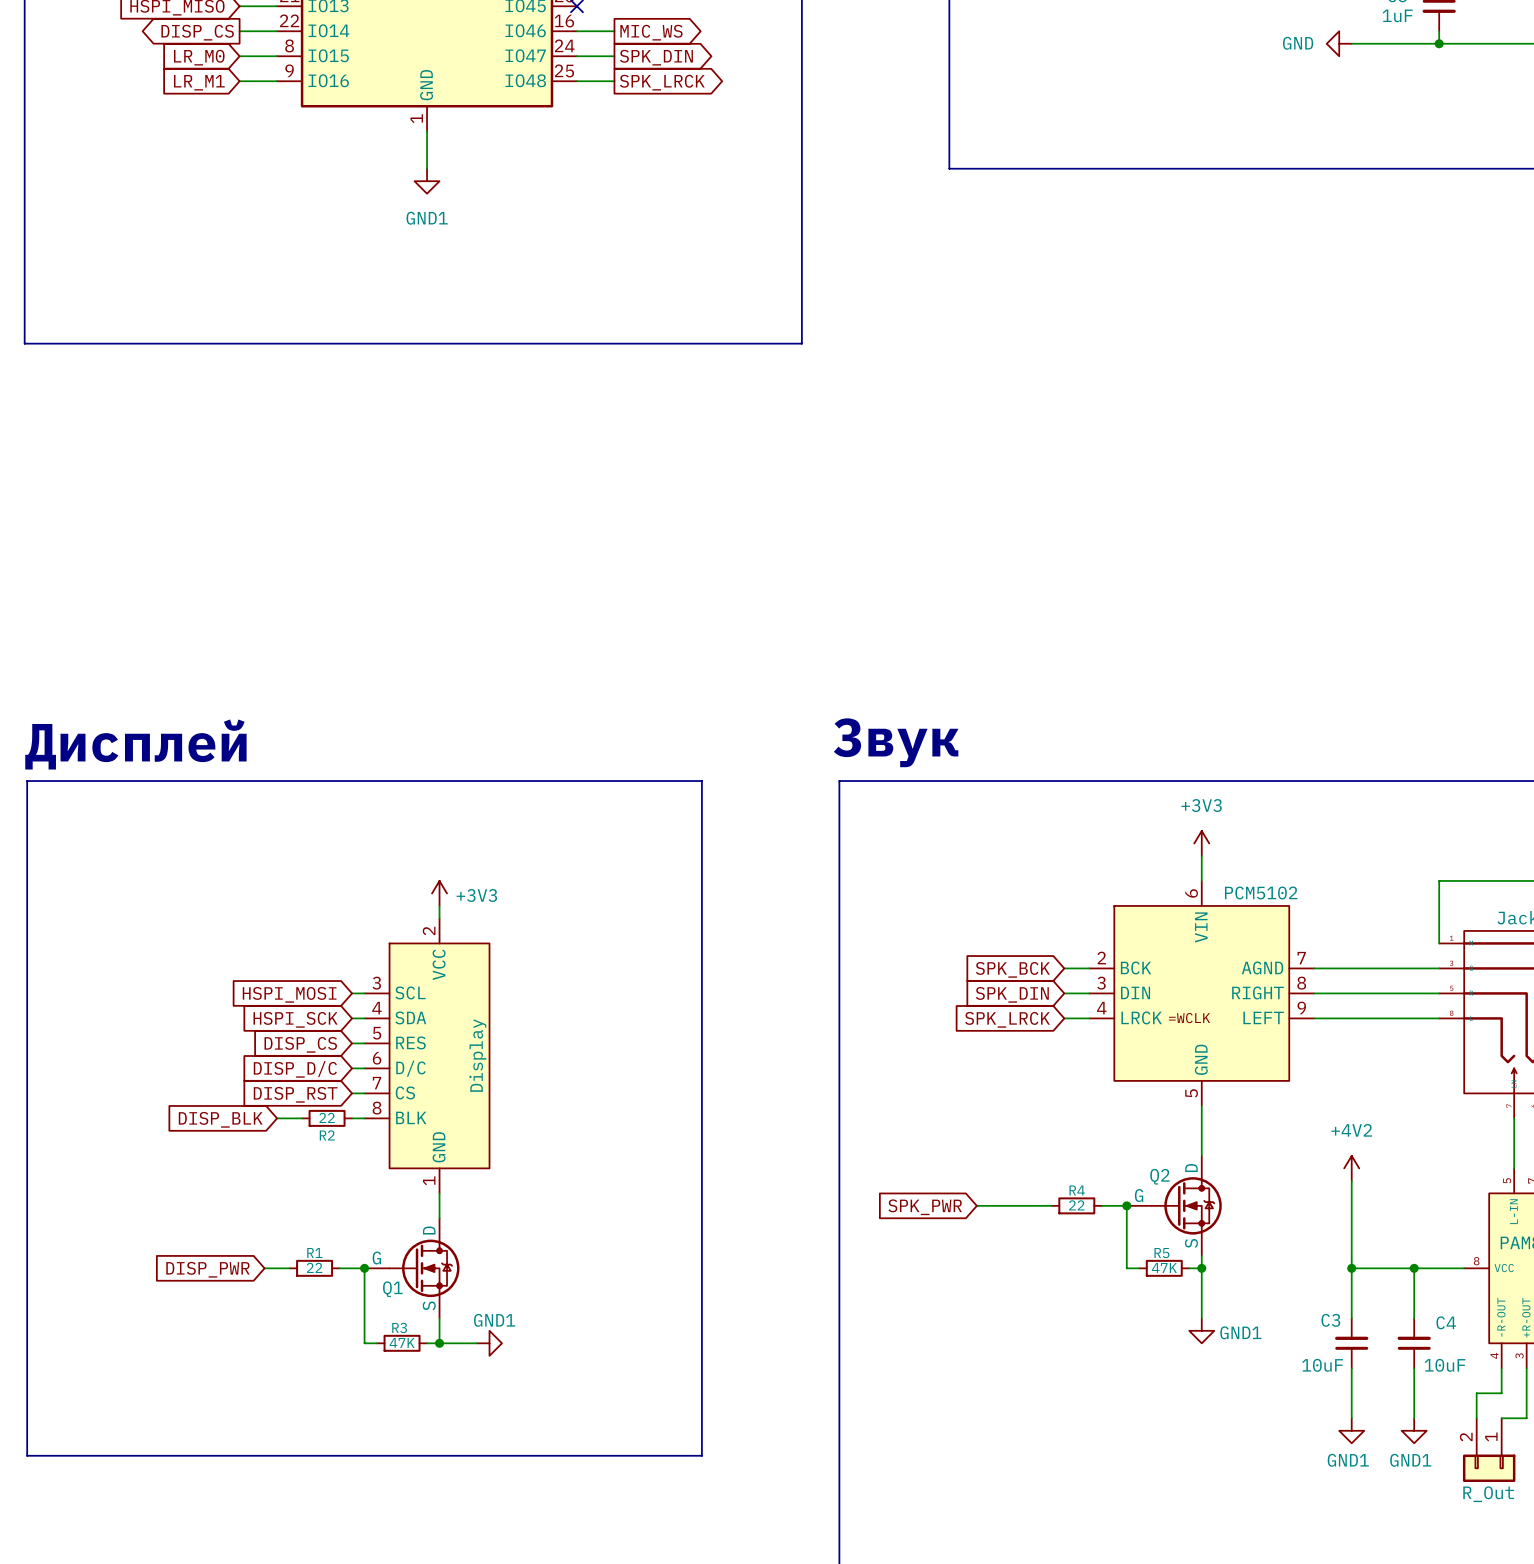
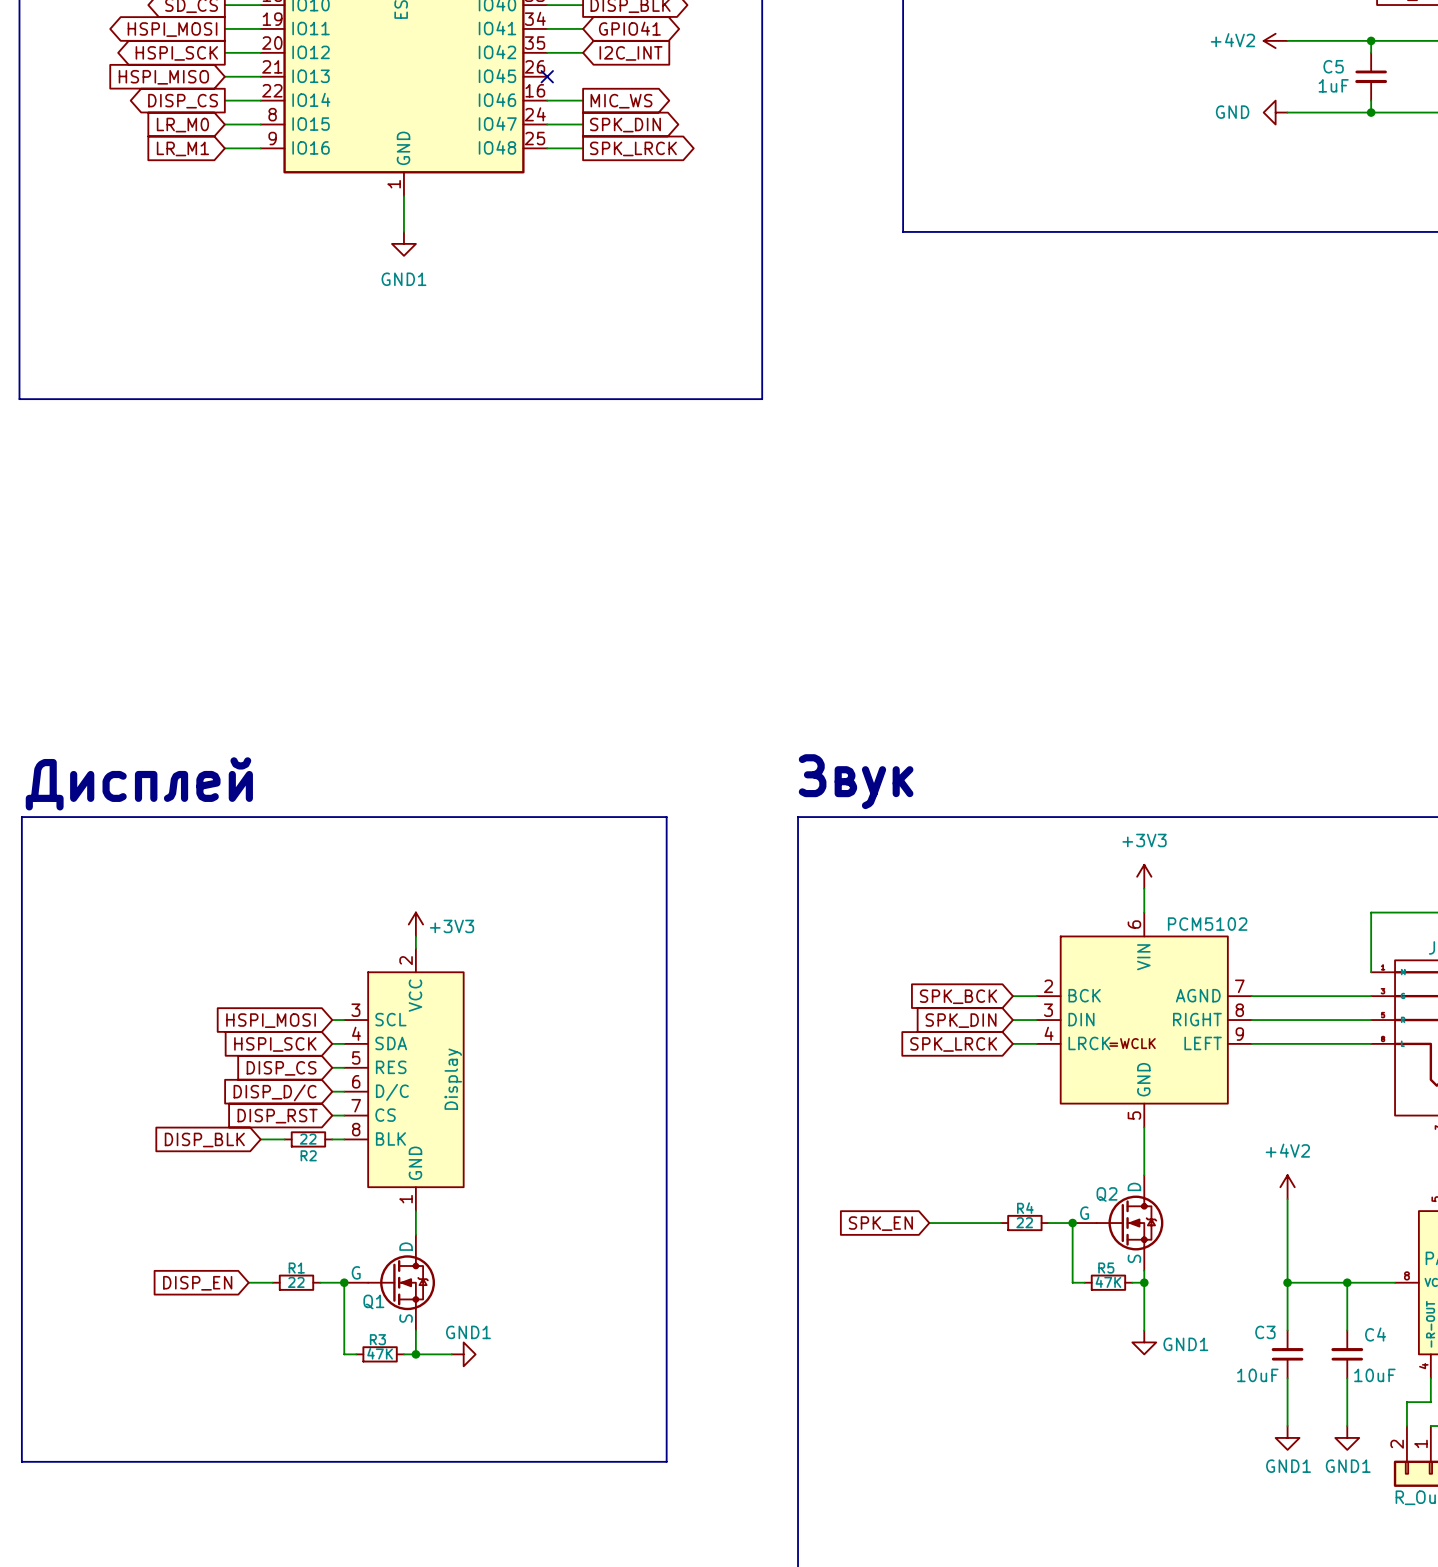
global label: SPK_PWR (925, 1207) -> SPK_EN (880, 1223)
global label: DISP_PWR (207, 1269) -> DISP_EN (197, 1283)

